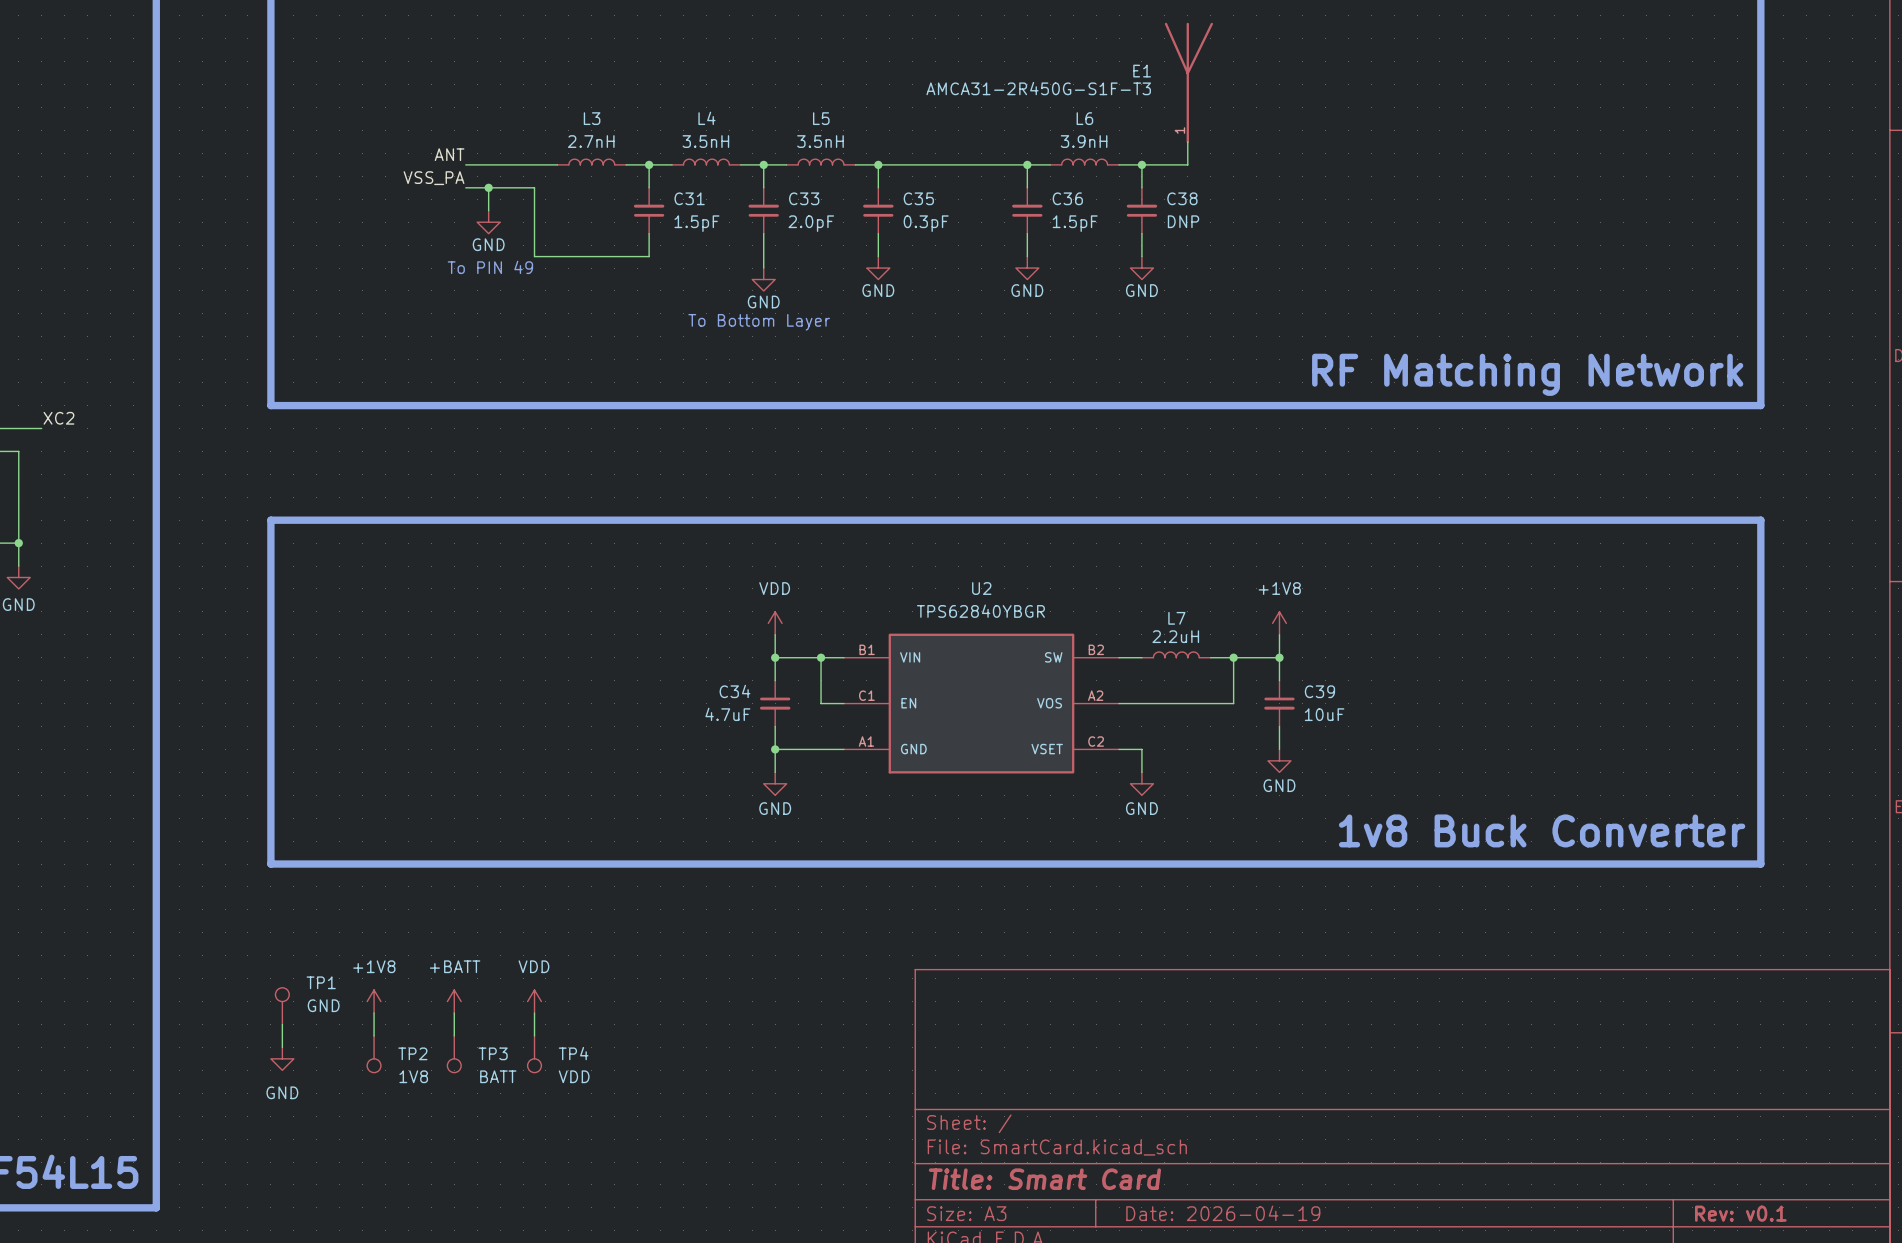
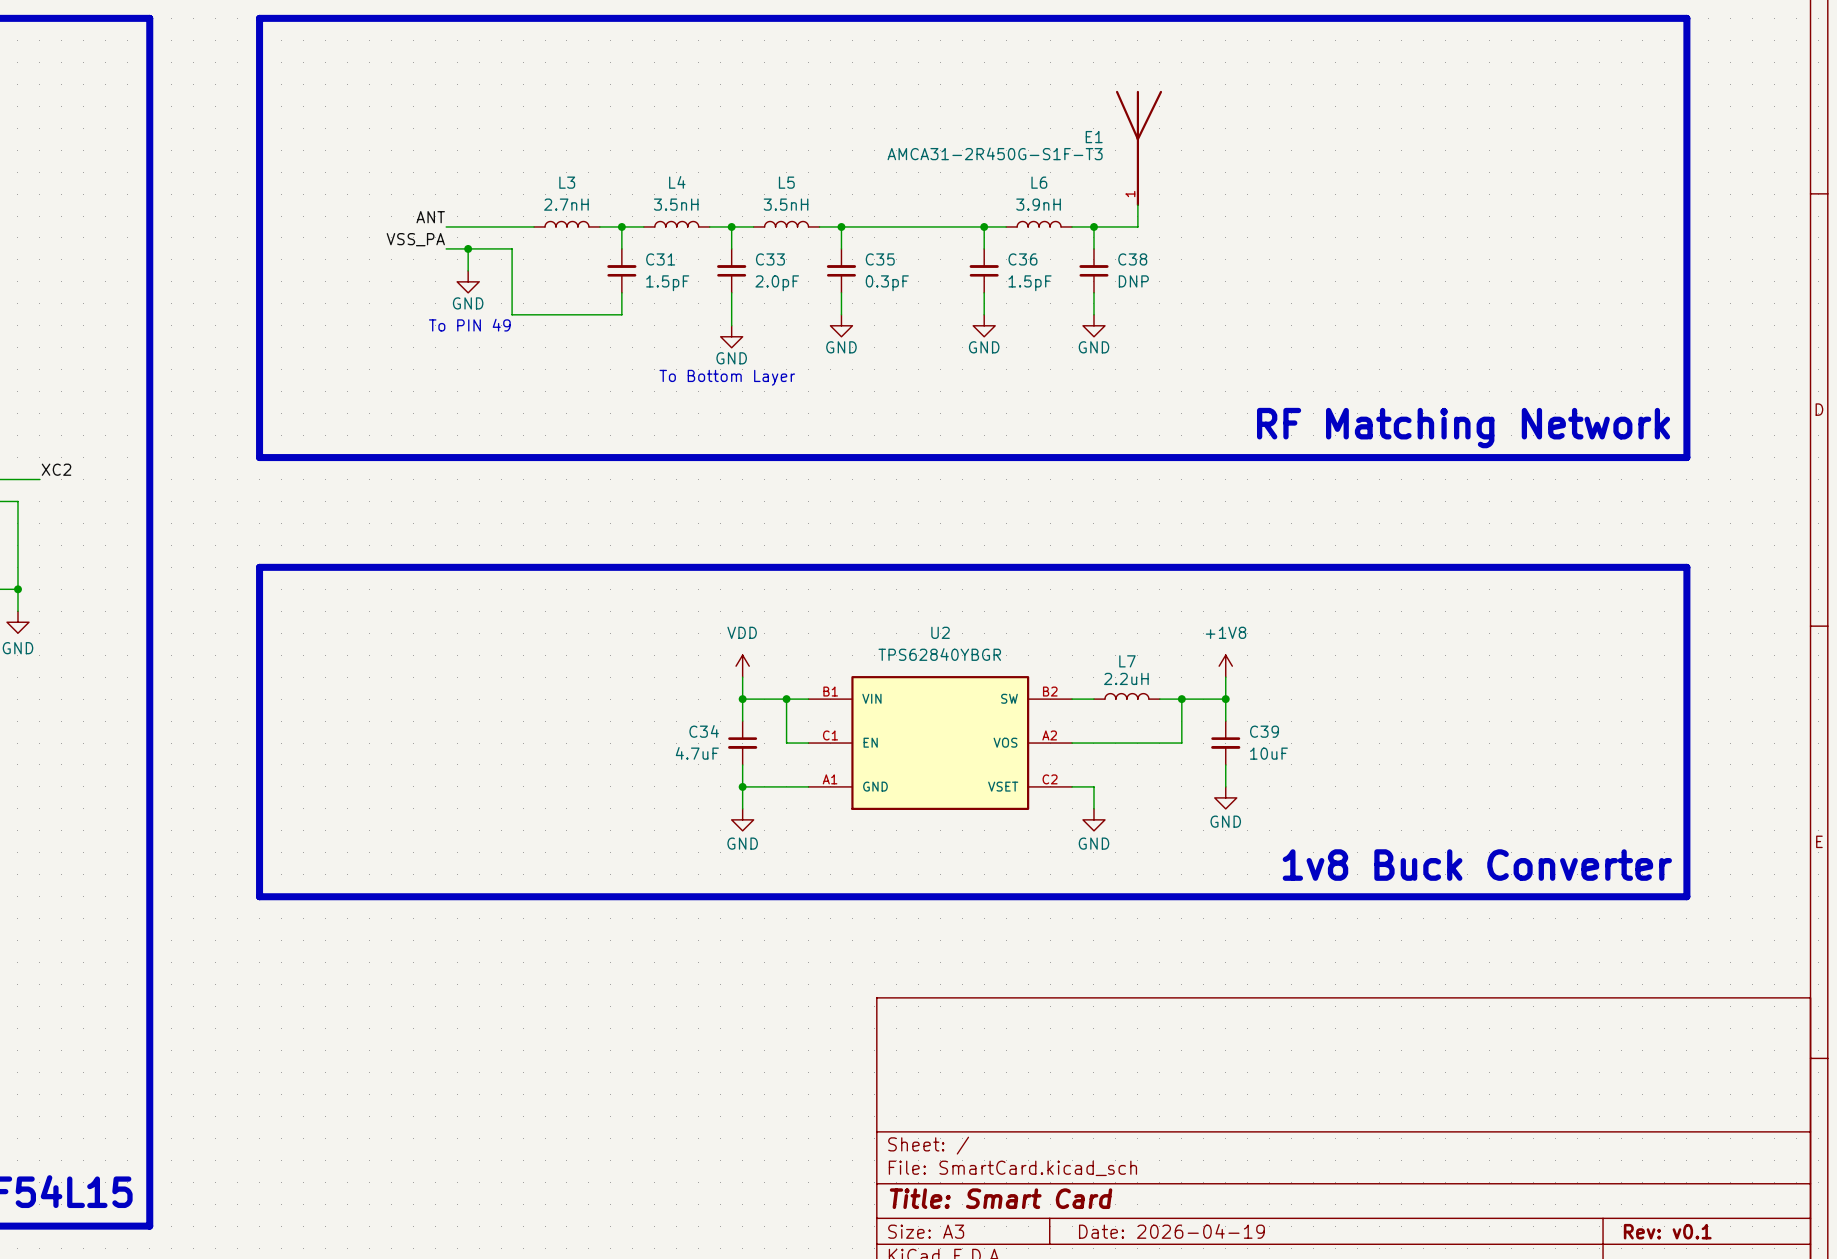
power symbol: +1V8 (374, 1001) -> none
power symbol: +BATT (454, 1001) -> none
power symbol: VDD (534, 1001) -> none
TP1: GND (282, 1006) -> none
wire: (374, 1013) (374, 1035) -> none
wire: (454, 1013) (454, 1035) -> none
wire: (534, 1013) (534, 1035) -> none
wire: (282, 1024) (282, 1047) -> none
TP2: 1V8 (374, 1054) -> none
TP3: BATT (454, 1054) -> none
TP4: VDD (534, 1054) -> none
power symbol: GND (282, 1058) -> none

